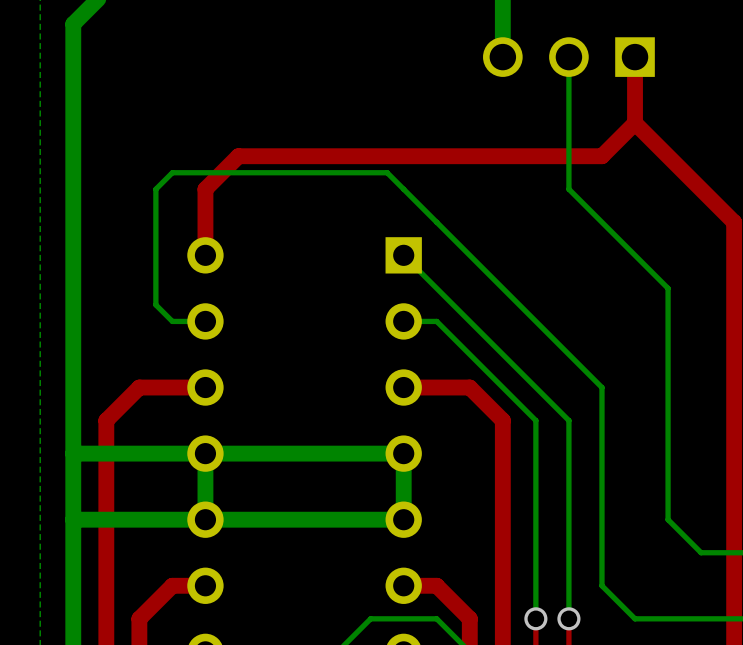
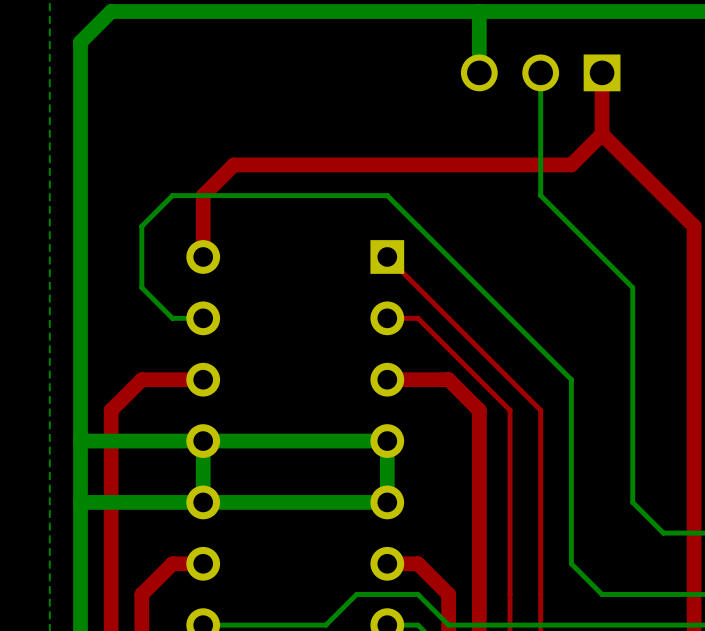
bottom track: (403, 189) (387, 172) (172, 172) (155, 189) (155, 304) -> (387, 195) (172, 195) (141, 226) (141, 287) (157, 302)
top track: none -> (387, 256) (540, 410) (540, 594)
bottom track: (403, 255) (568, 420) (568, 618) -> none
top track: none -> (387, 318) (417, 318) (510, 410) (510, 594)
bottom track: (403, 321) (436, 321) (535, 420) (535, 618) -> none
via: (535, 618) -> none
via: (568, 618) -> none

